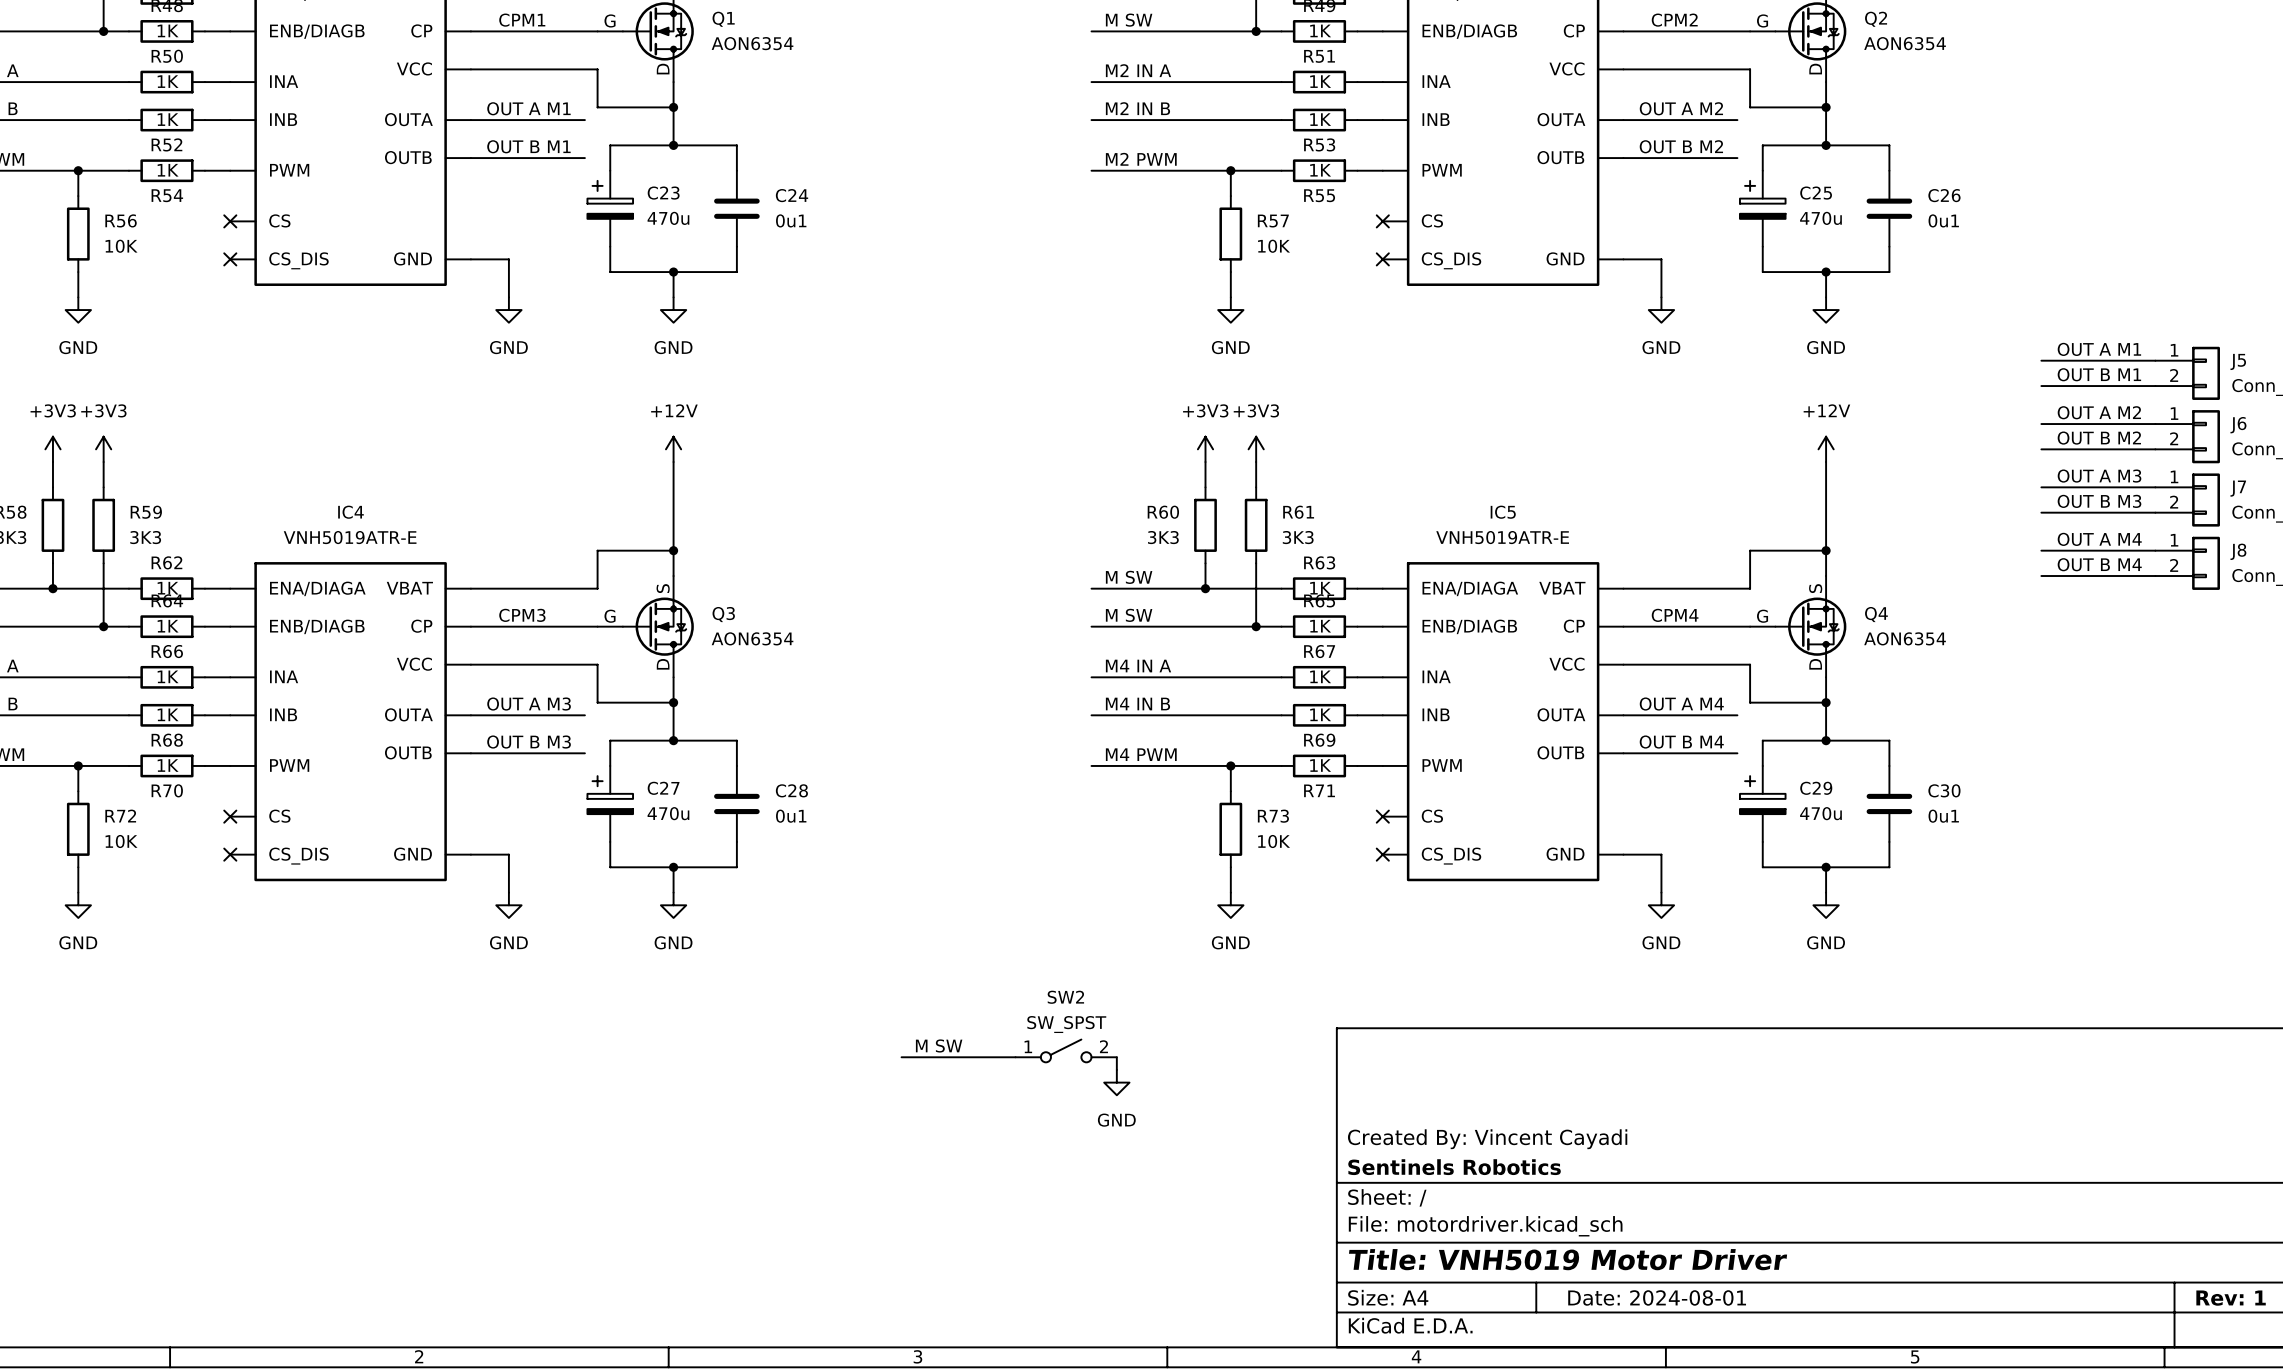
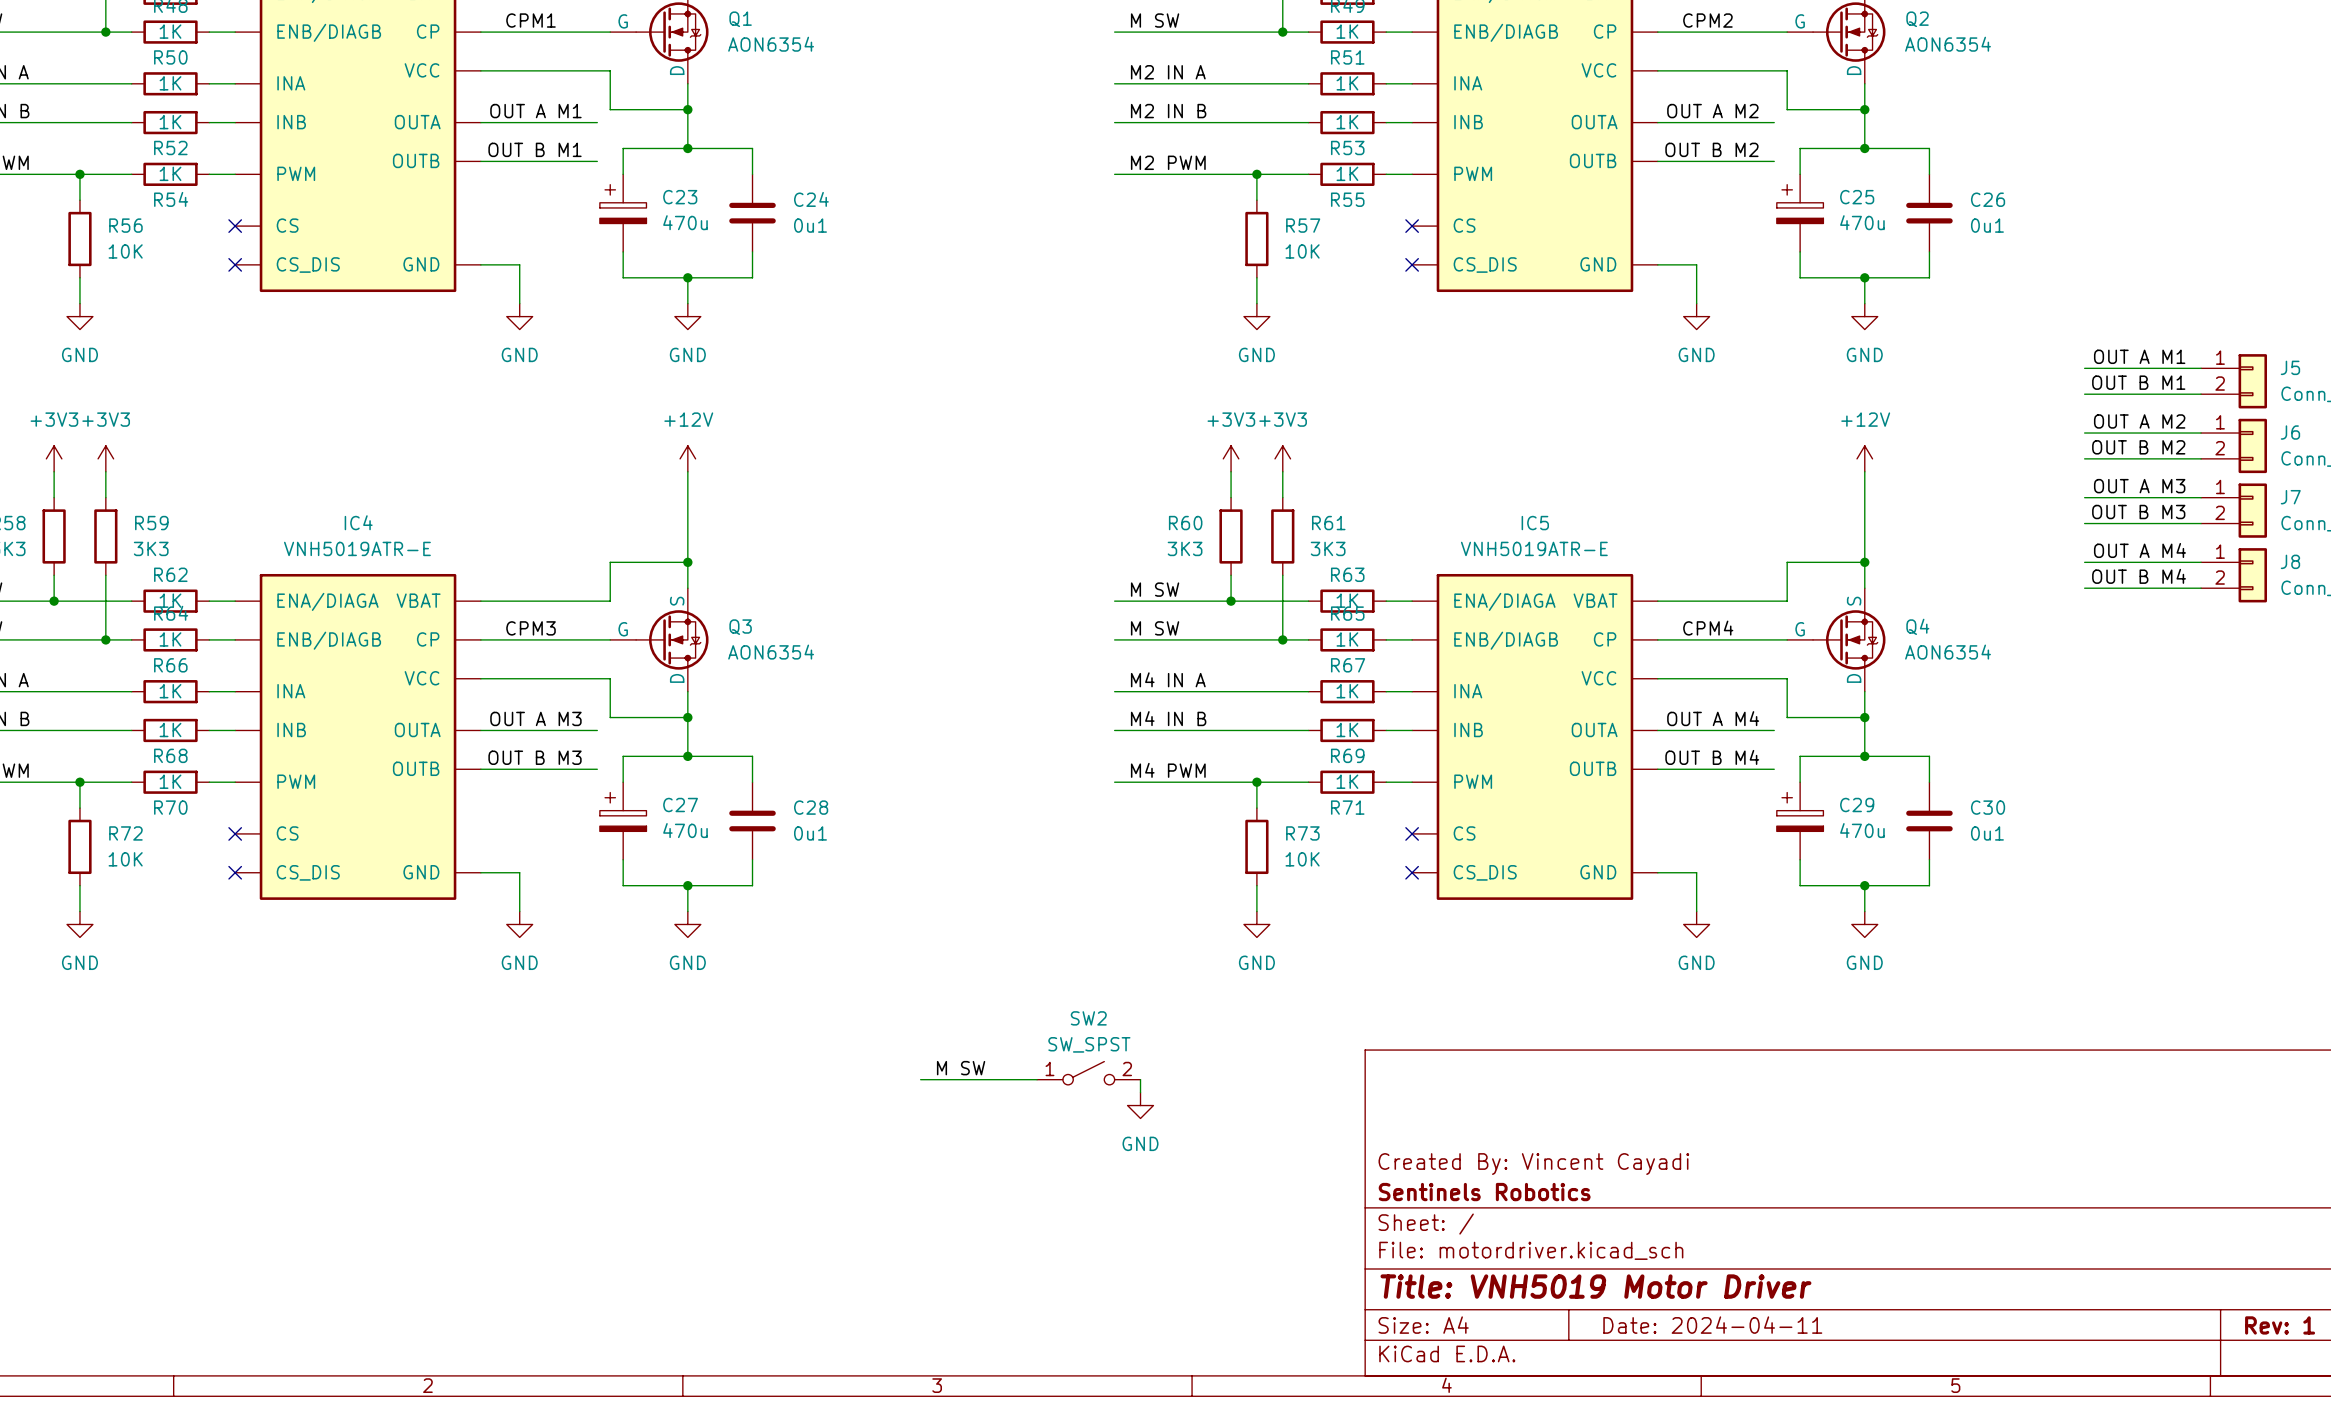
title block: Date: 2024-08-01 (1657, 1297) -> Date: 2024-04-11 (1712, 1325)

